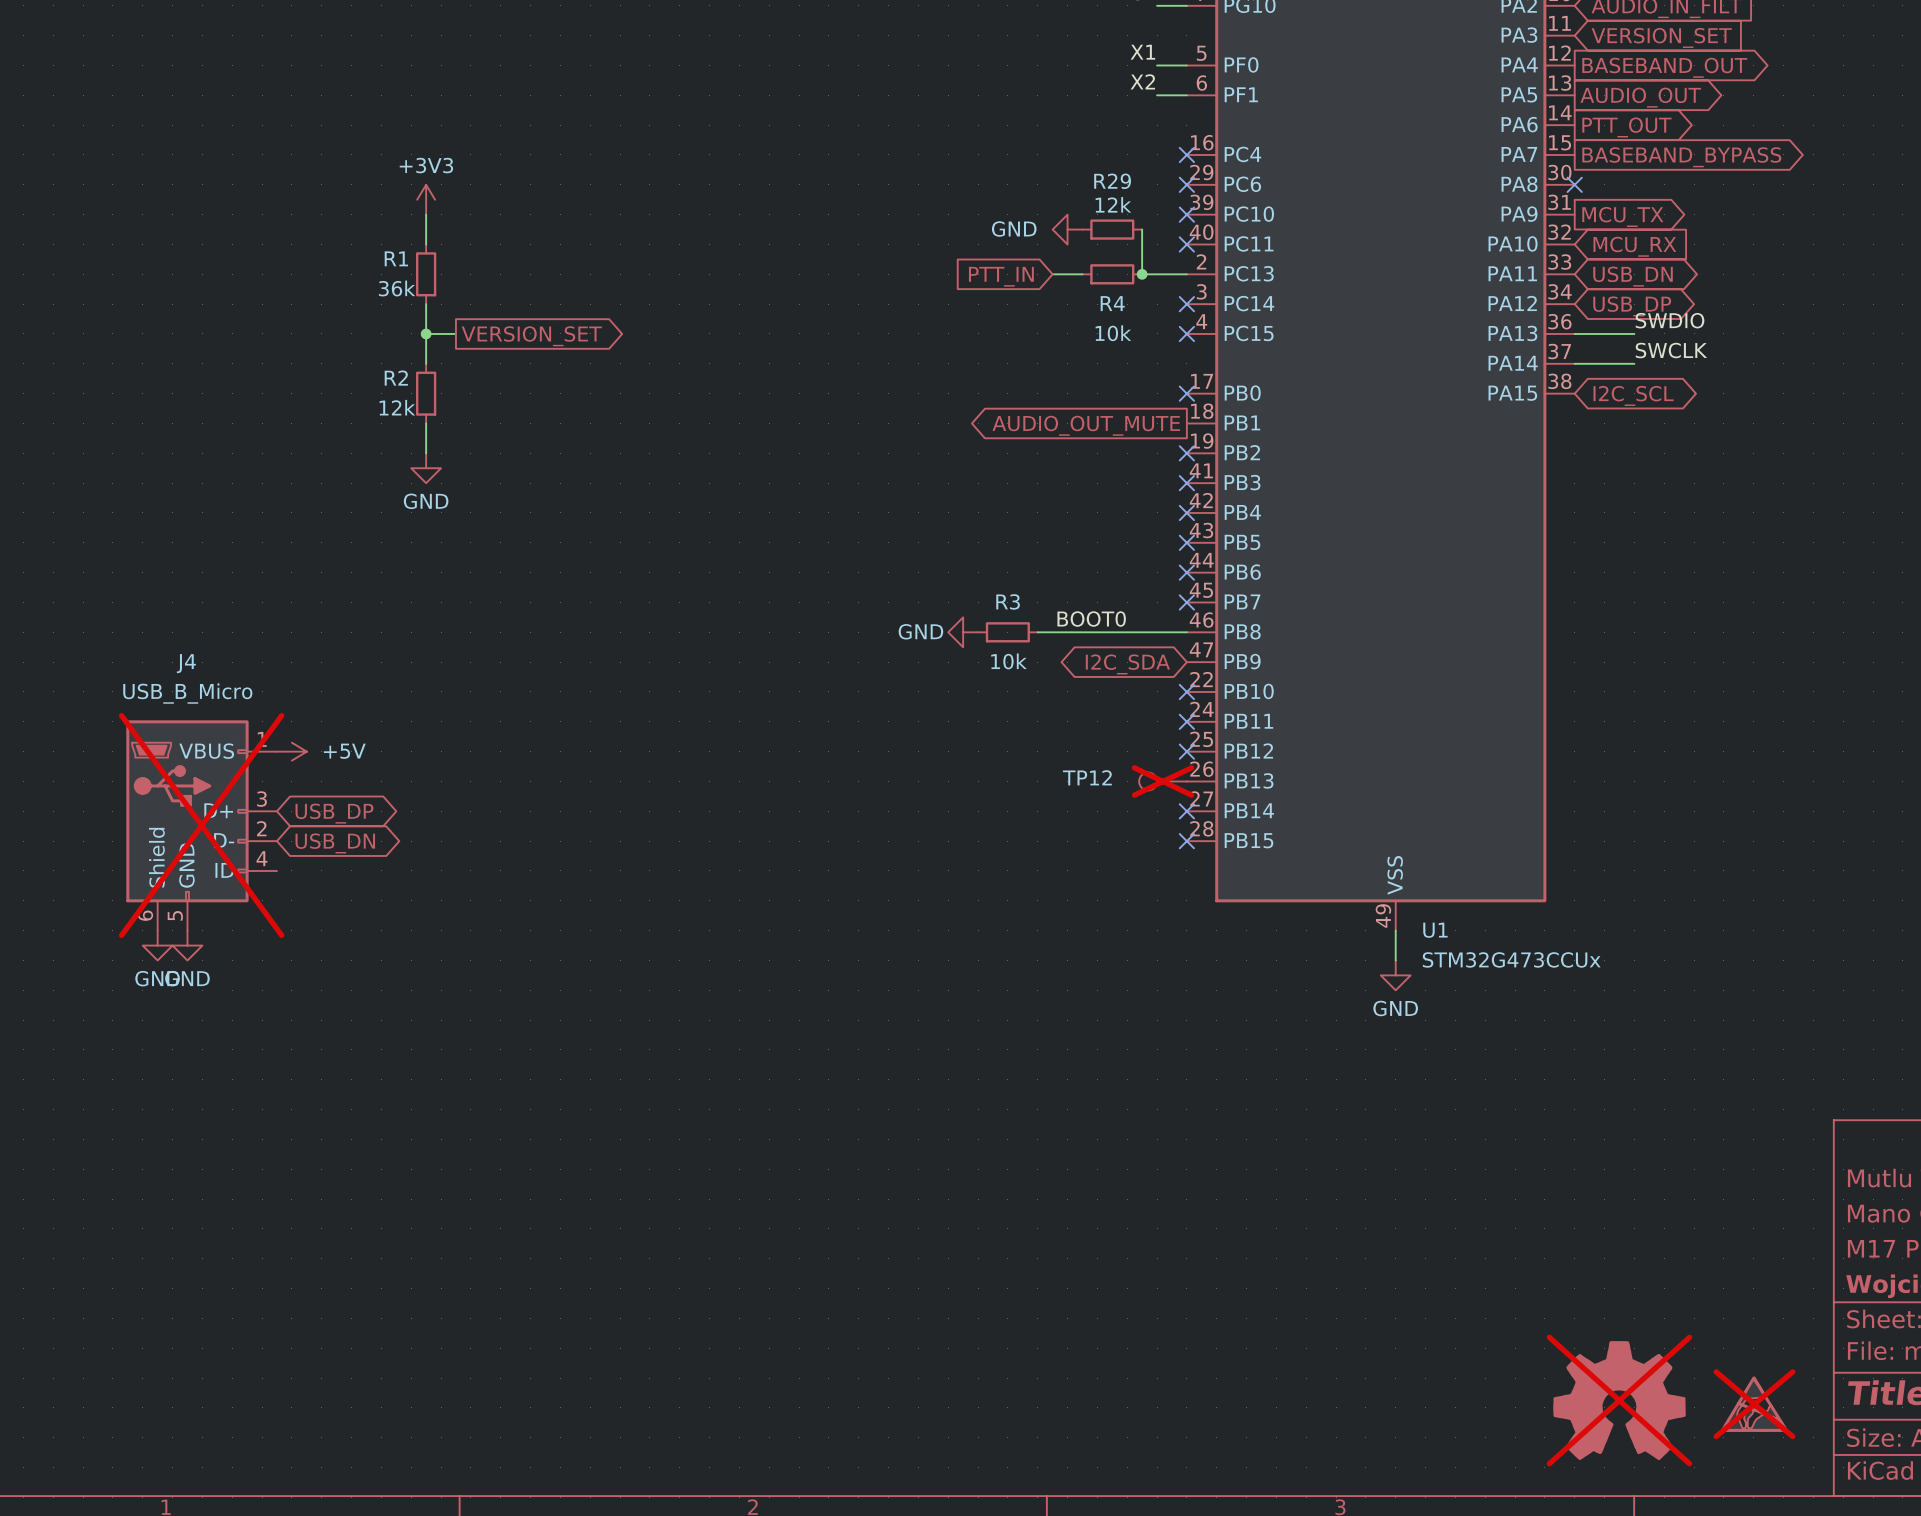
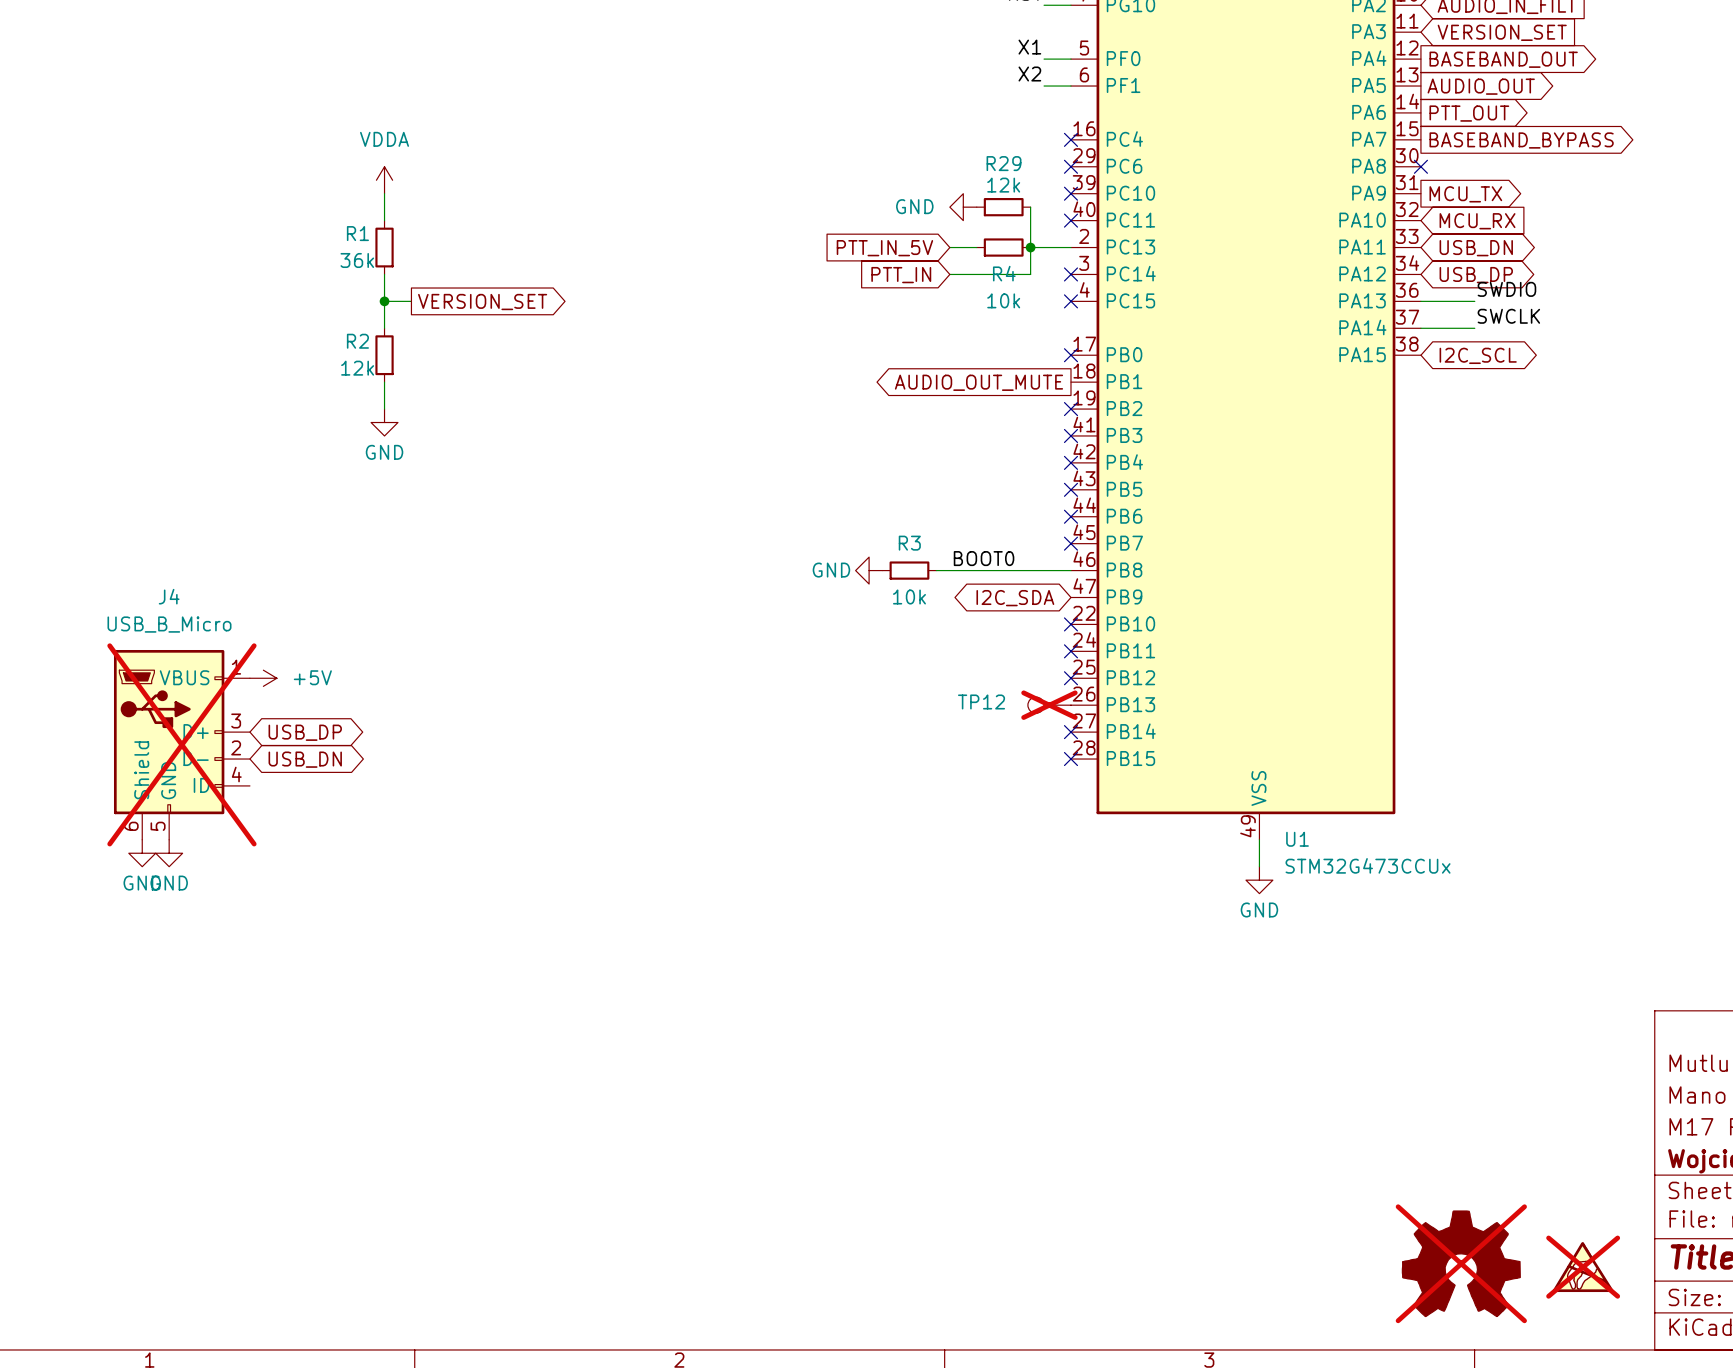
power symbol: +3V3 (426, 199) -> VDDA (384, 180)
wire: none -> (1030, 247) (1030, 274) (949, 274)
global label: PTT_IN (1001, 276) -> PTT_IN_5V (884, 248)
global label: none -> PTT_IN (901, 275)

